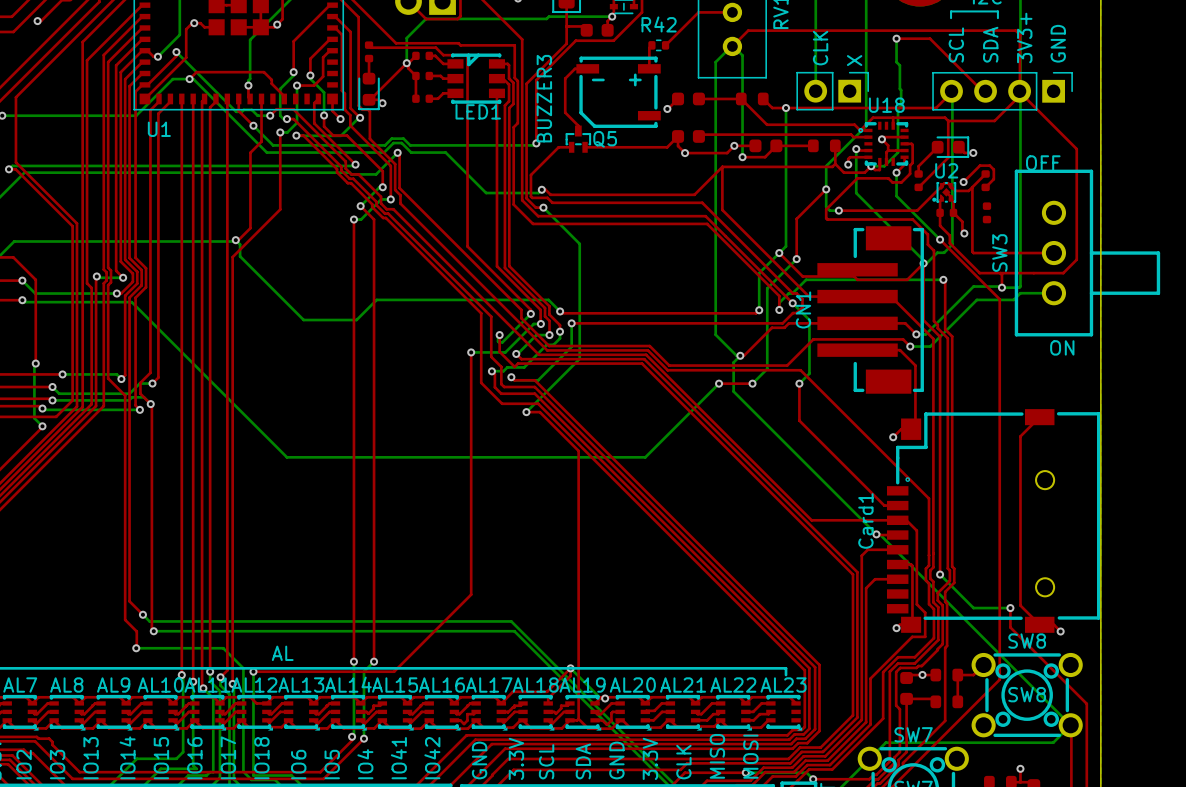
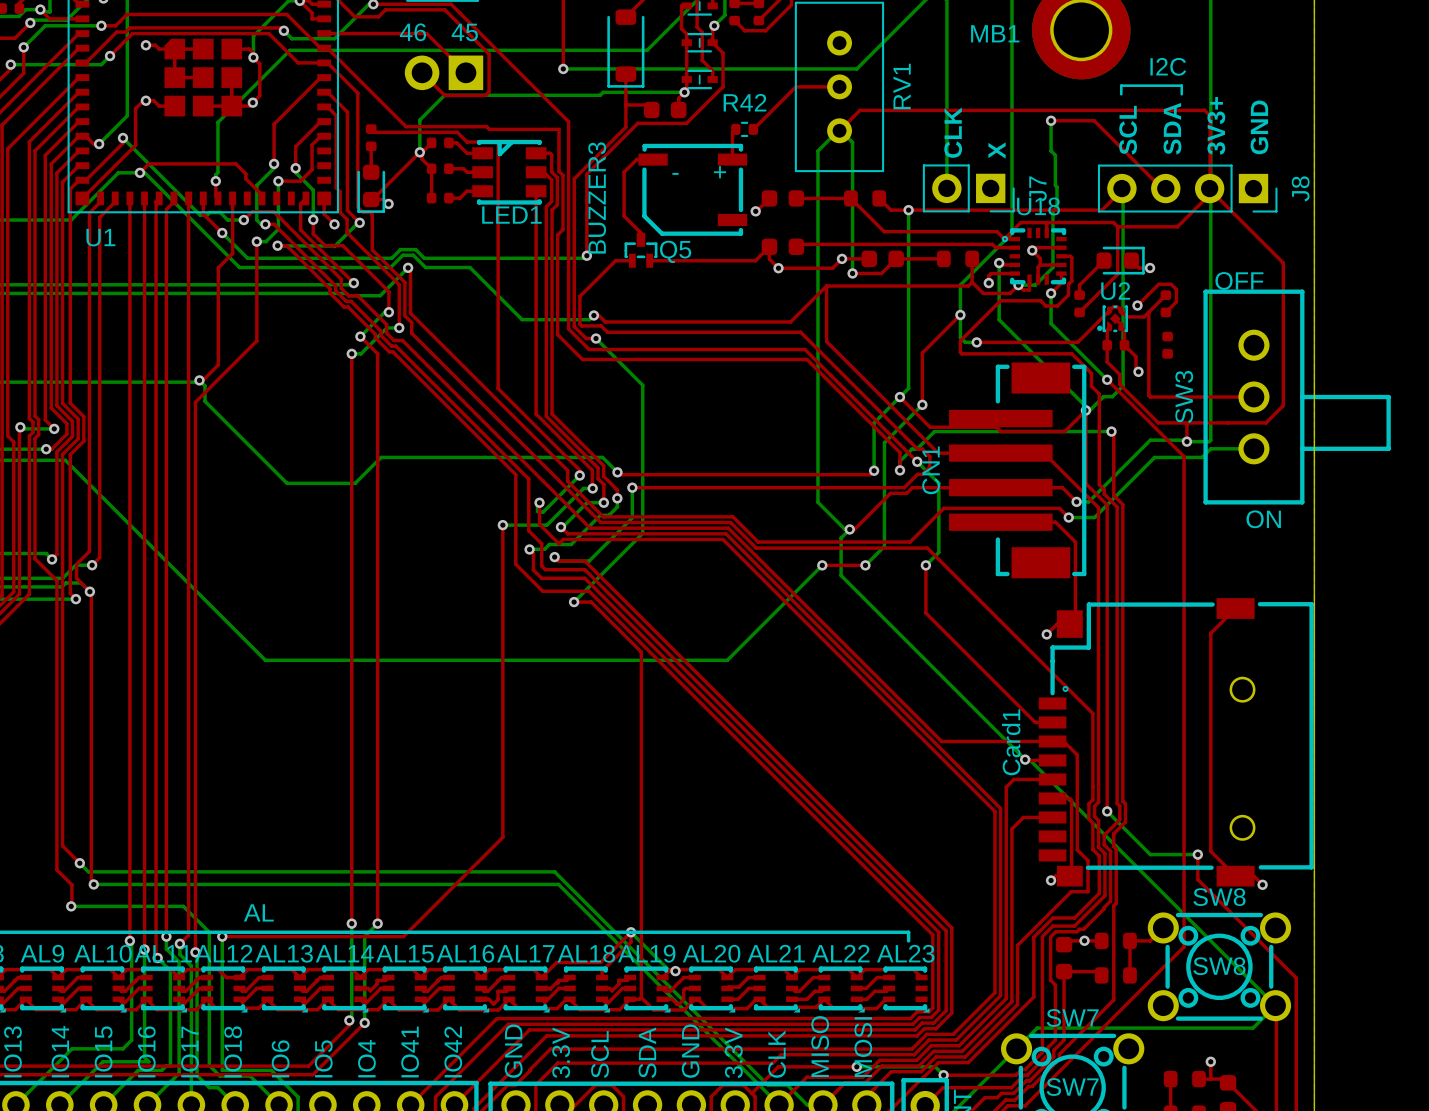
part: (832, 91) -> none
J7: none -> (968, 188)
part: (1002, 91) -> none
J8: none -> (1187, 188)

